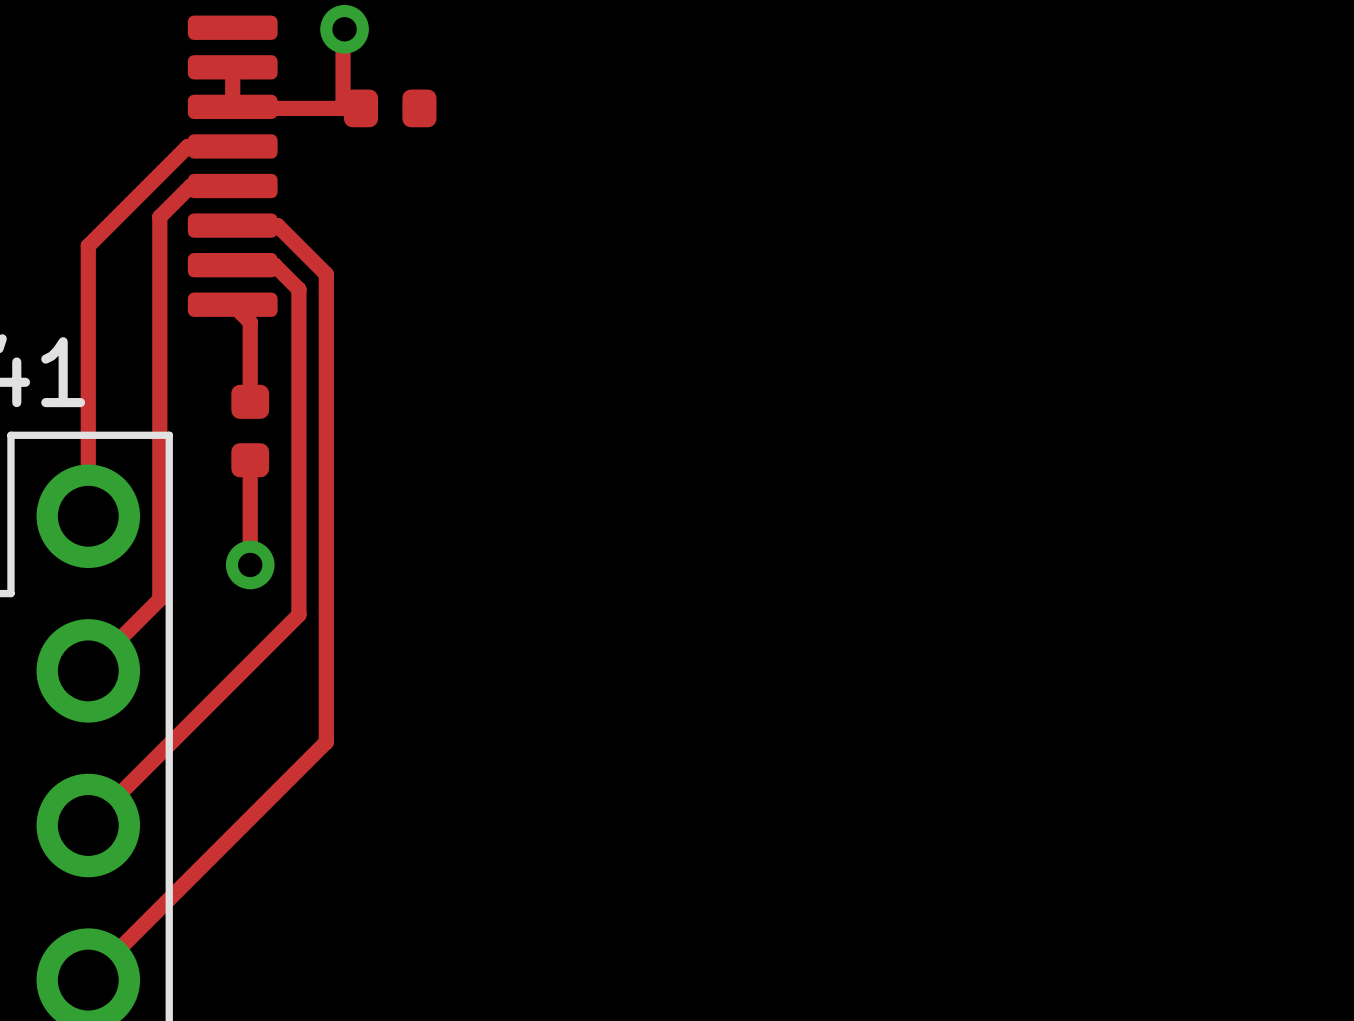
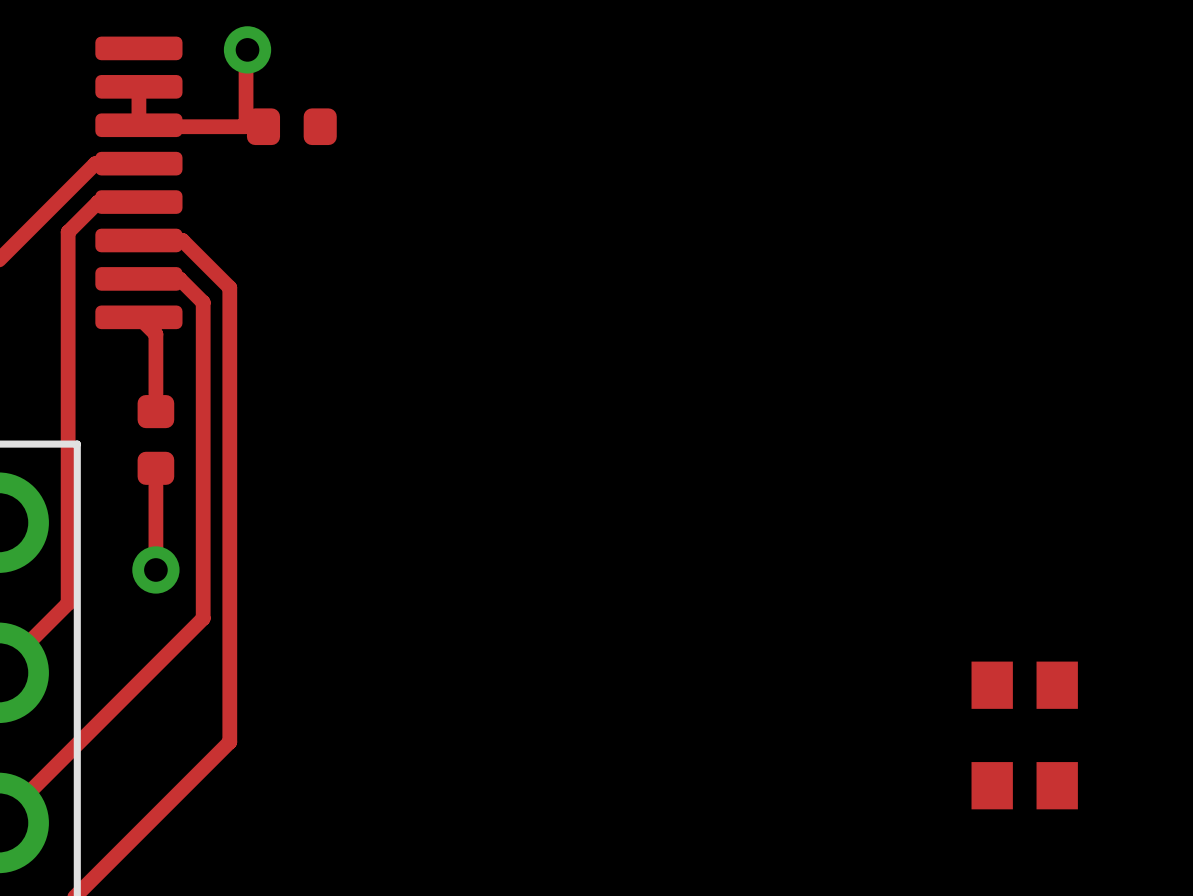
part: none -> (1024, 735)

